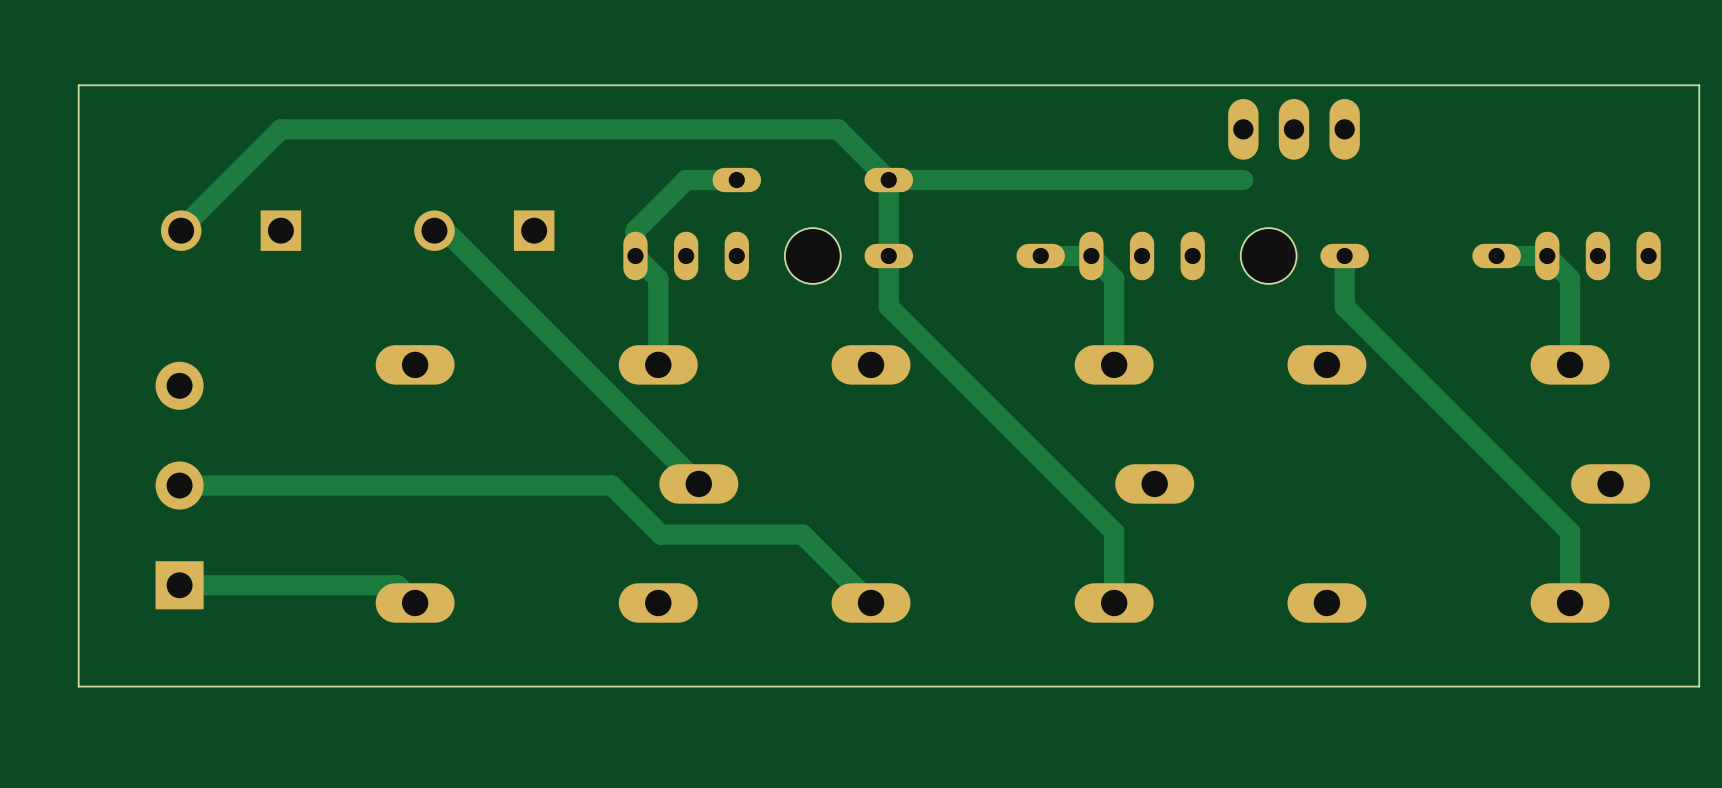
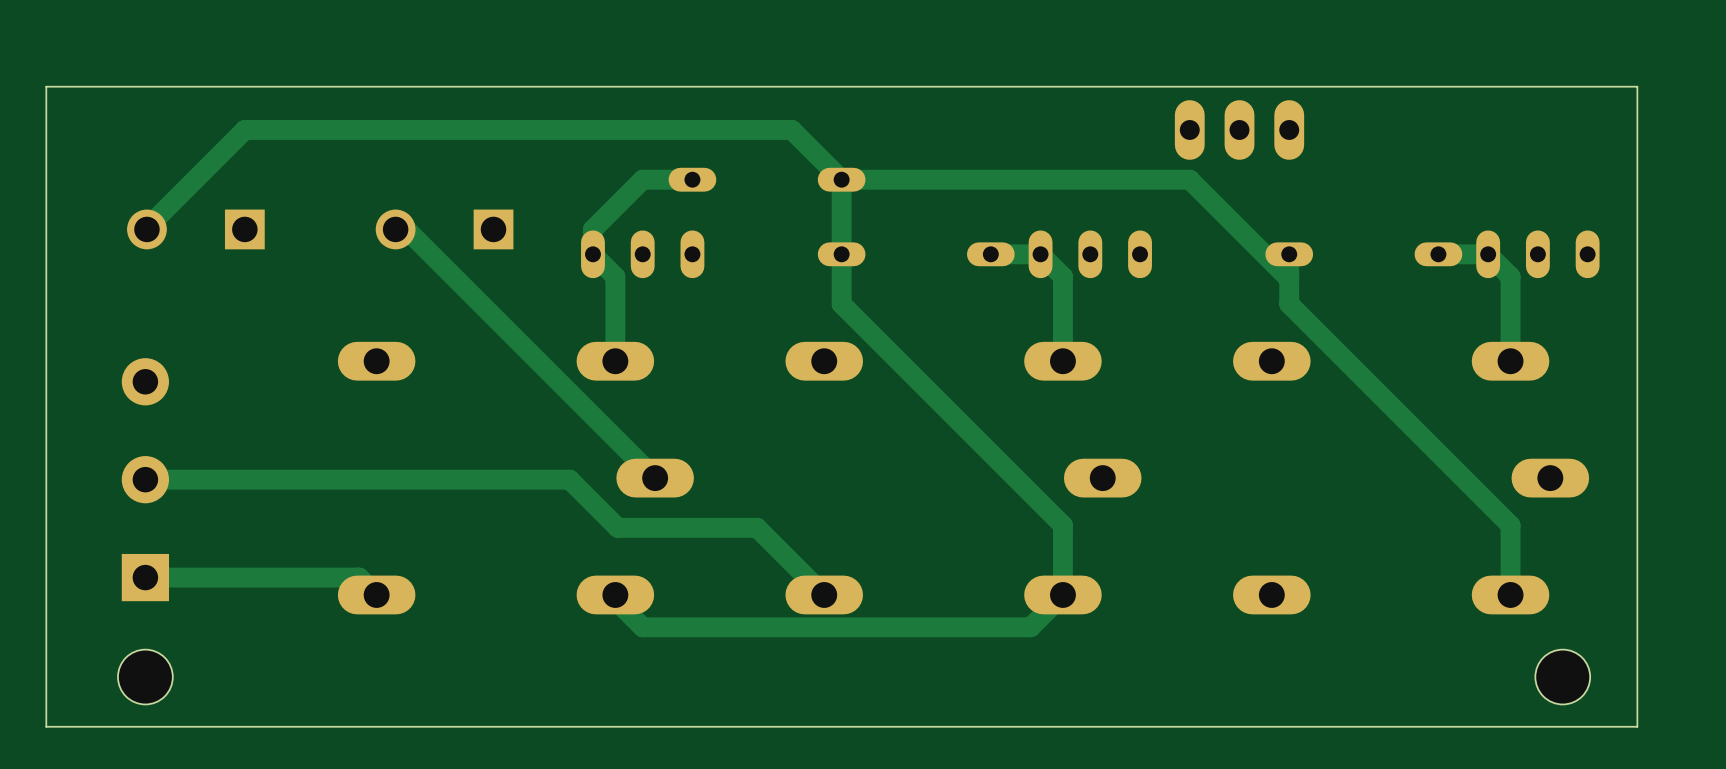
track: none -> (1189, 179) (1289, 279)
hole: (812, 256) -> none
hole: (1268, 256) -> none
track: none -> (1062, 594) (1030, 627) (642, 627) (615, 599) (615, 594)
hole: none -> (145, 677)
hole: none -> (1562, 677)
board edge: (1699, 686) (78, 686) -> (1637, 677) (1637, 726) (46, 726) (46, 677)

